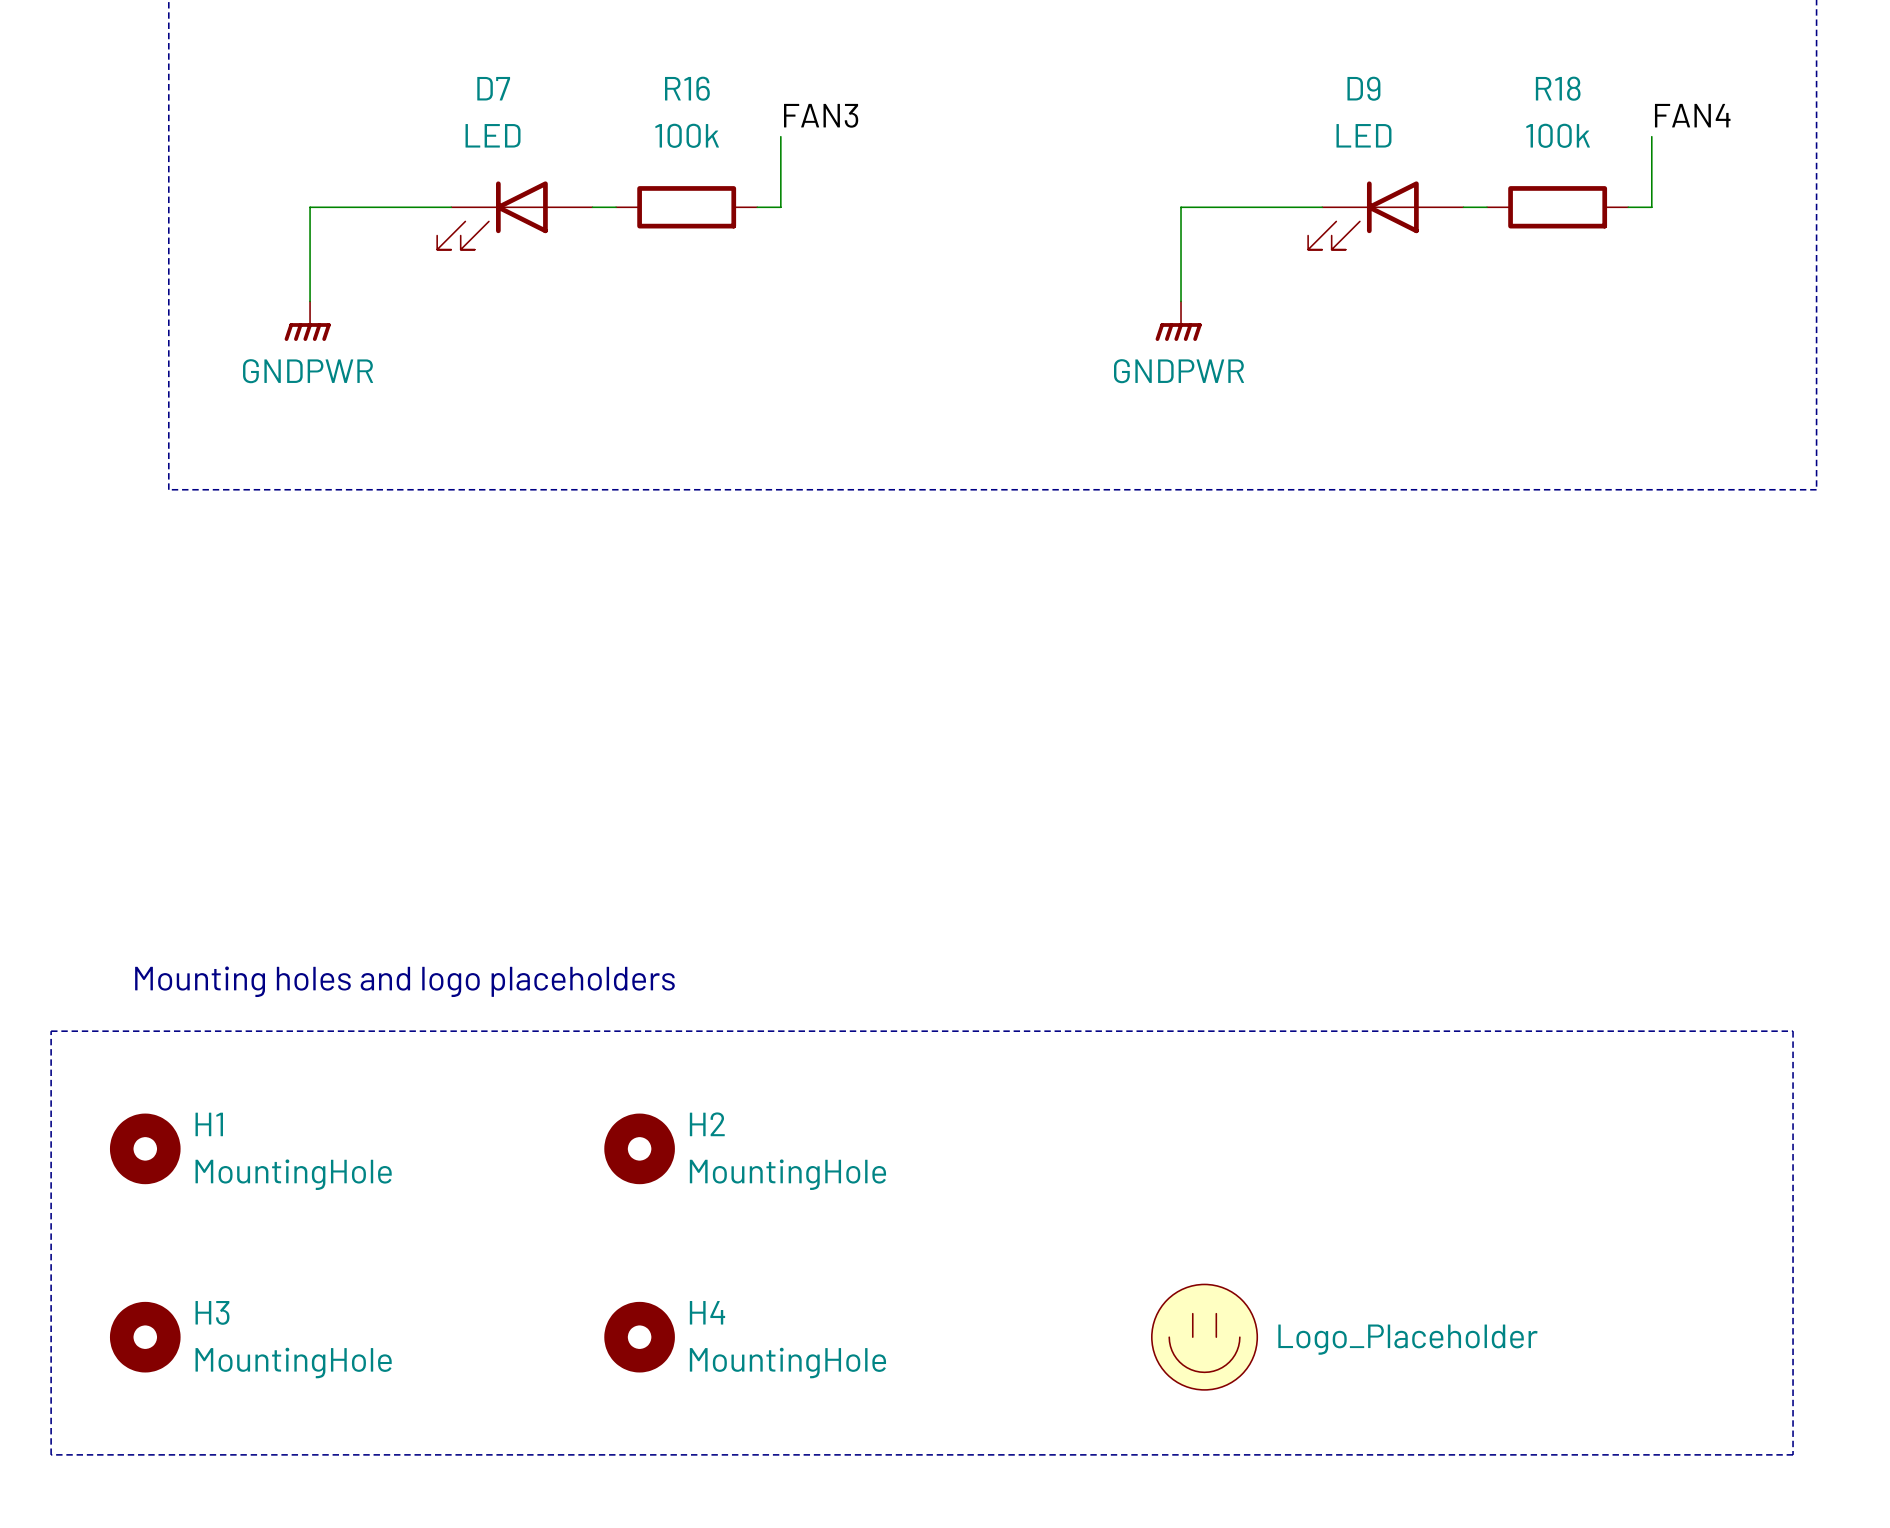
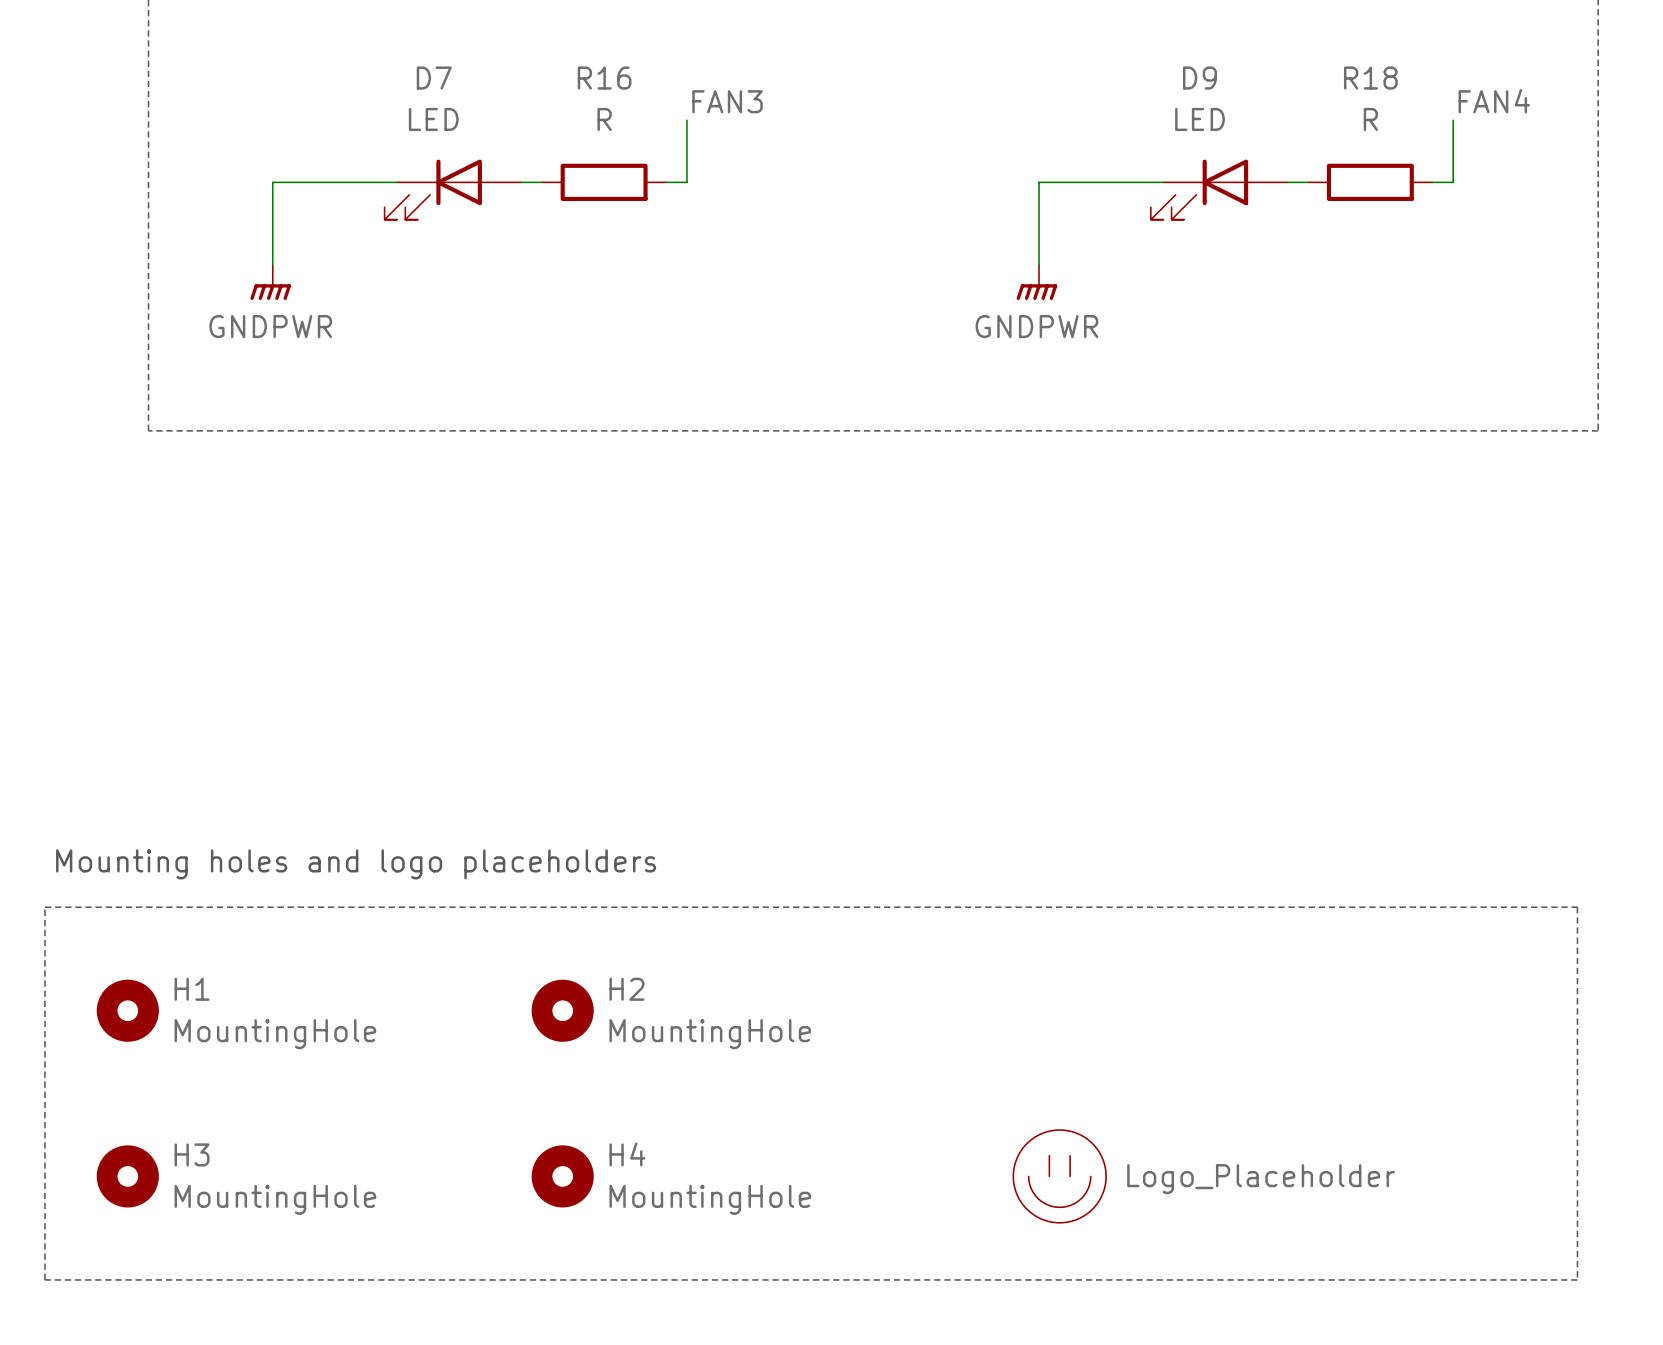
R16 value: 100k (687, 135) -> R (604, 119)
R18 value: 100k (1558, 135) -> R (1370, 119)

